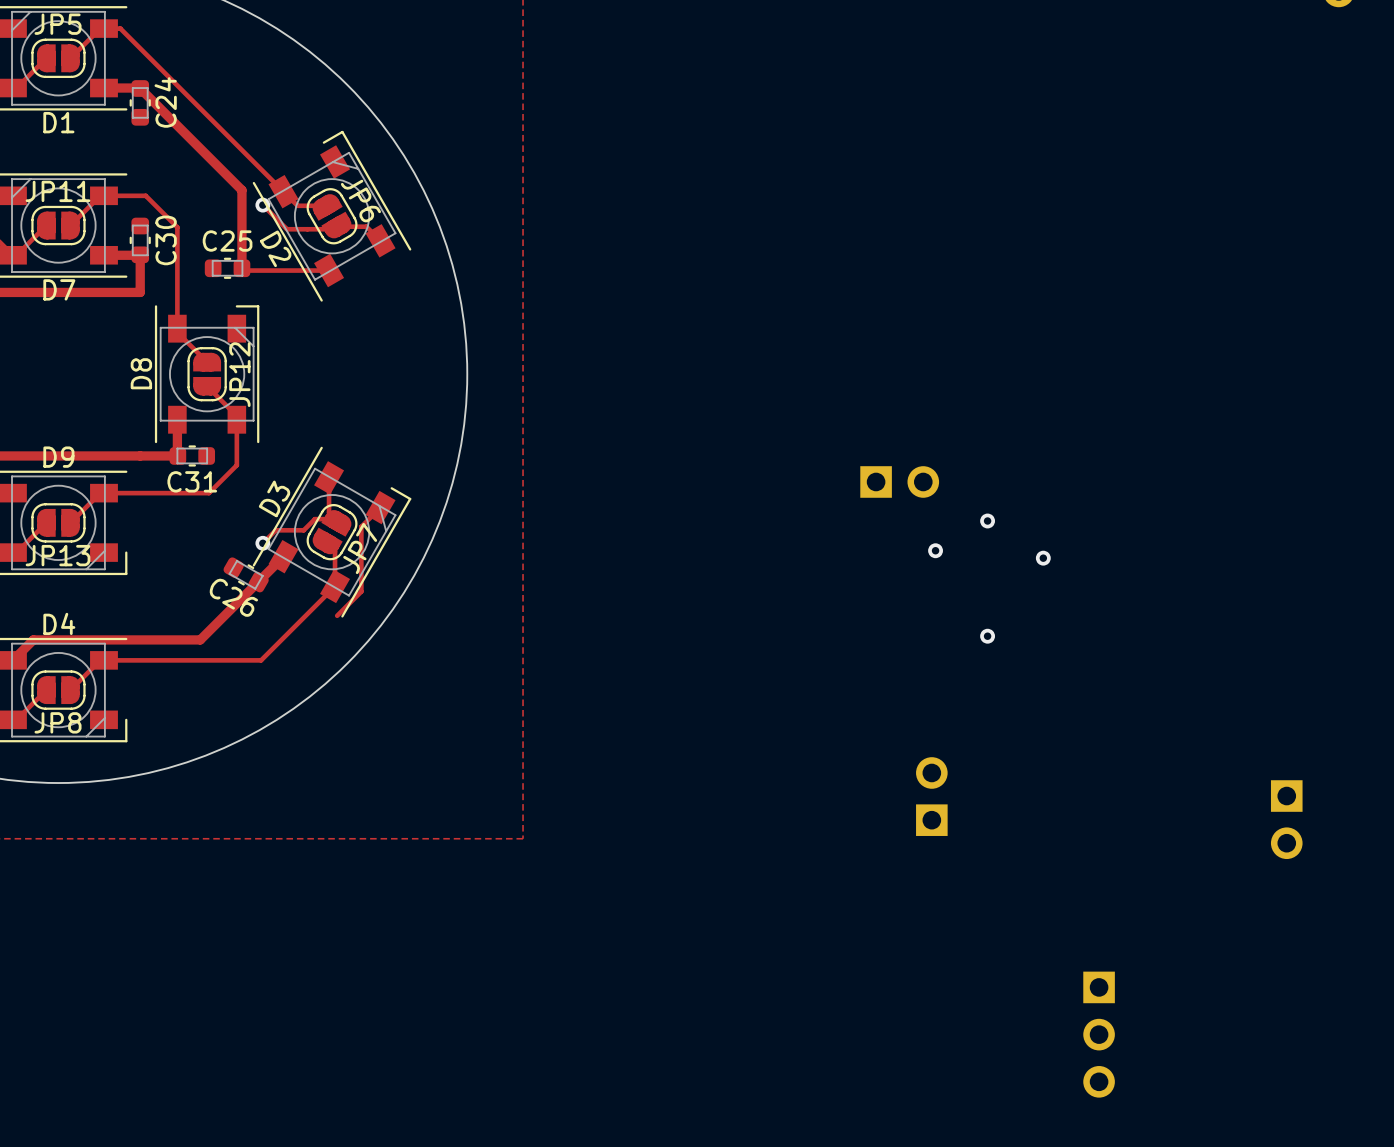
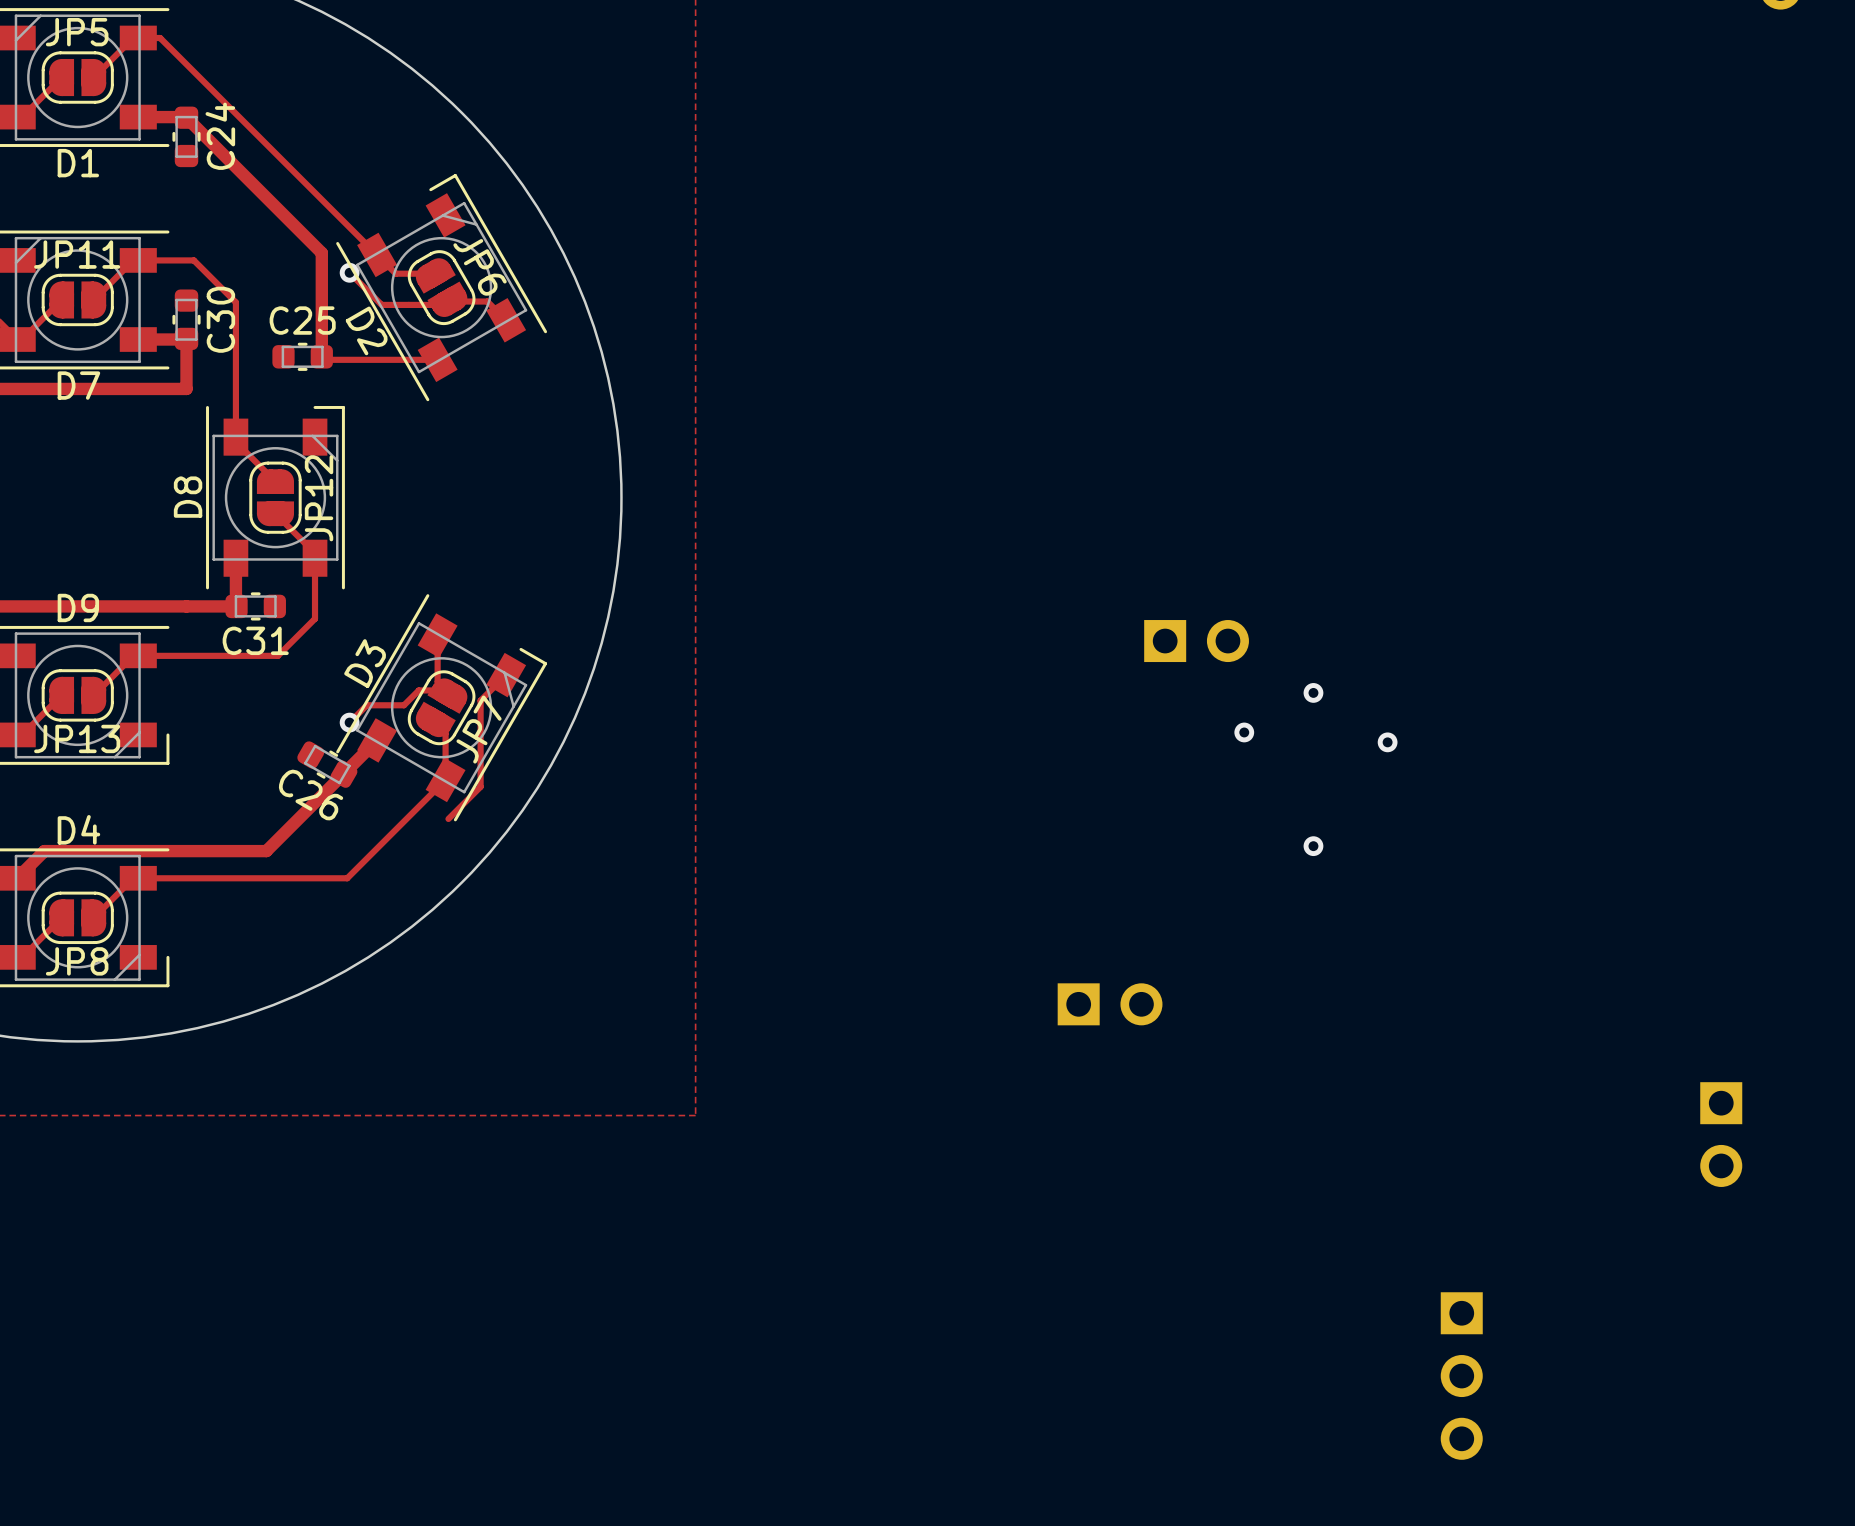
part rotation: 0° (931, 796) -> 90° clockwise (1110, 1004)
part position: (931, 796) -> (1110, 1004)
part position: (1286, 819) -> (1721, 1134)

